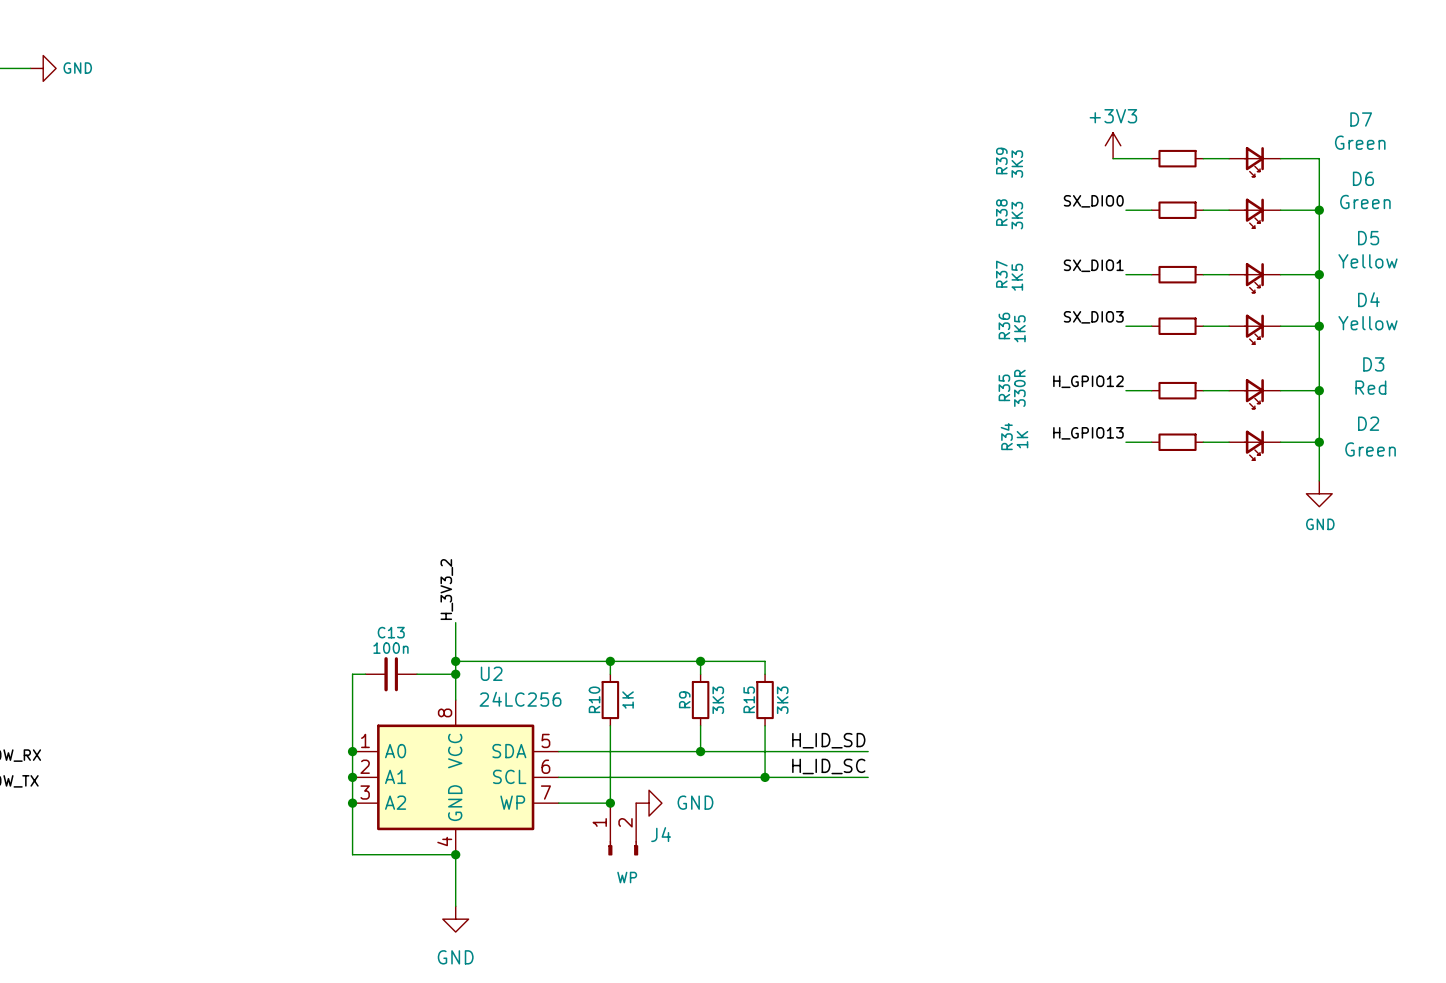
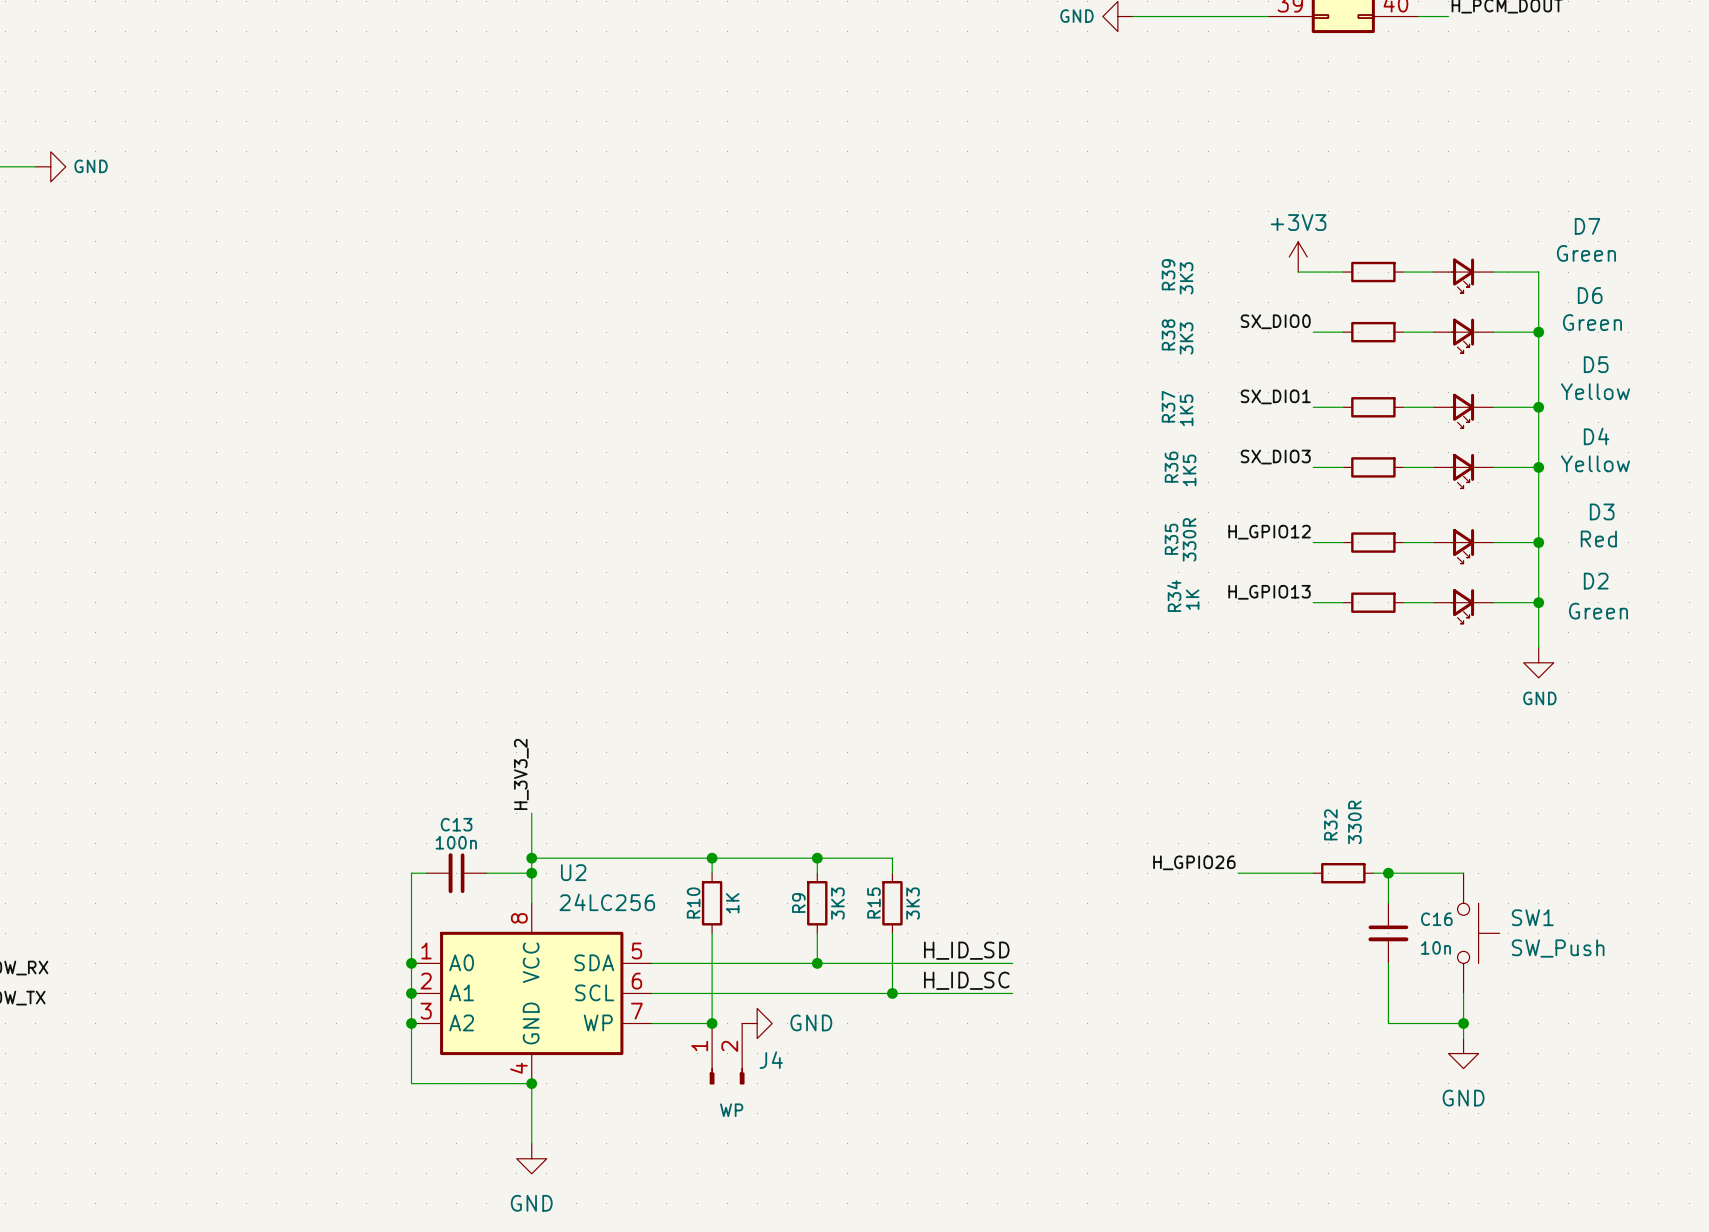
label: none -> H_GPIO26 (1194, 862)
wire: none -> (1238, 873) (1313, 873)
R32: none -> 330R (1343, 873)
wire: none -> (1373, 873) (1463, 873)
wire: none -> (1388, 873) (1388, 903)
junction: none -> (1388, 873)
C16: none -> 10n (1388, 933)
SW1: none -> SW_Push (1478, 933)
wire: none -> (1388, 963) (1388, 1023) (1463, 1023)
wire: none -> (1463, 993) (1463, 1038)
junction: none -> (1463, 1023)
power symbol: none -> GND (1463, 1053)

